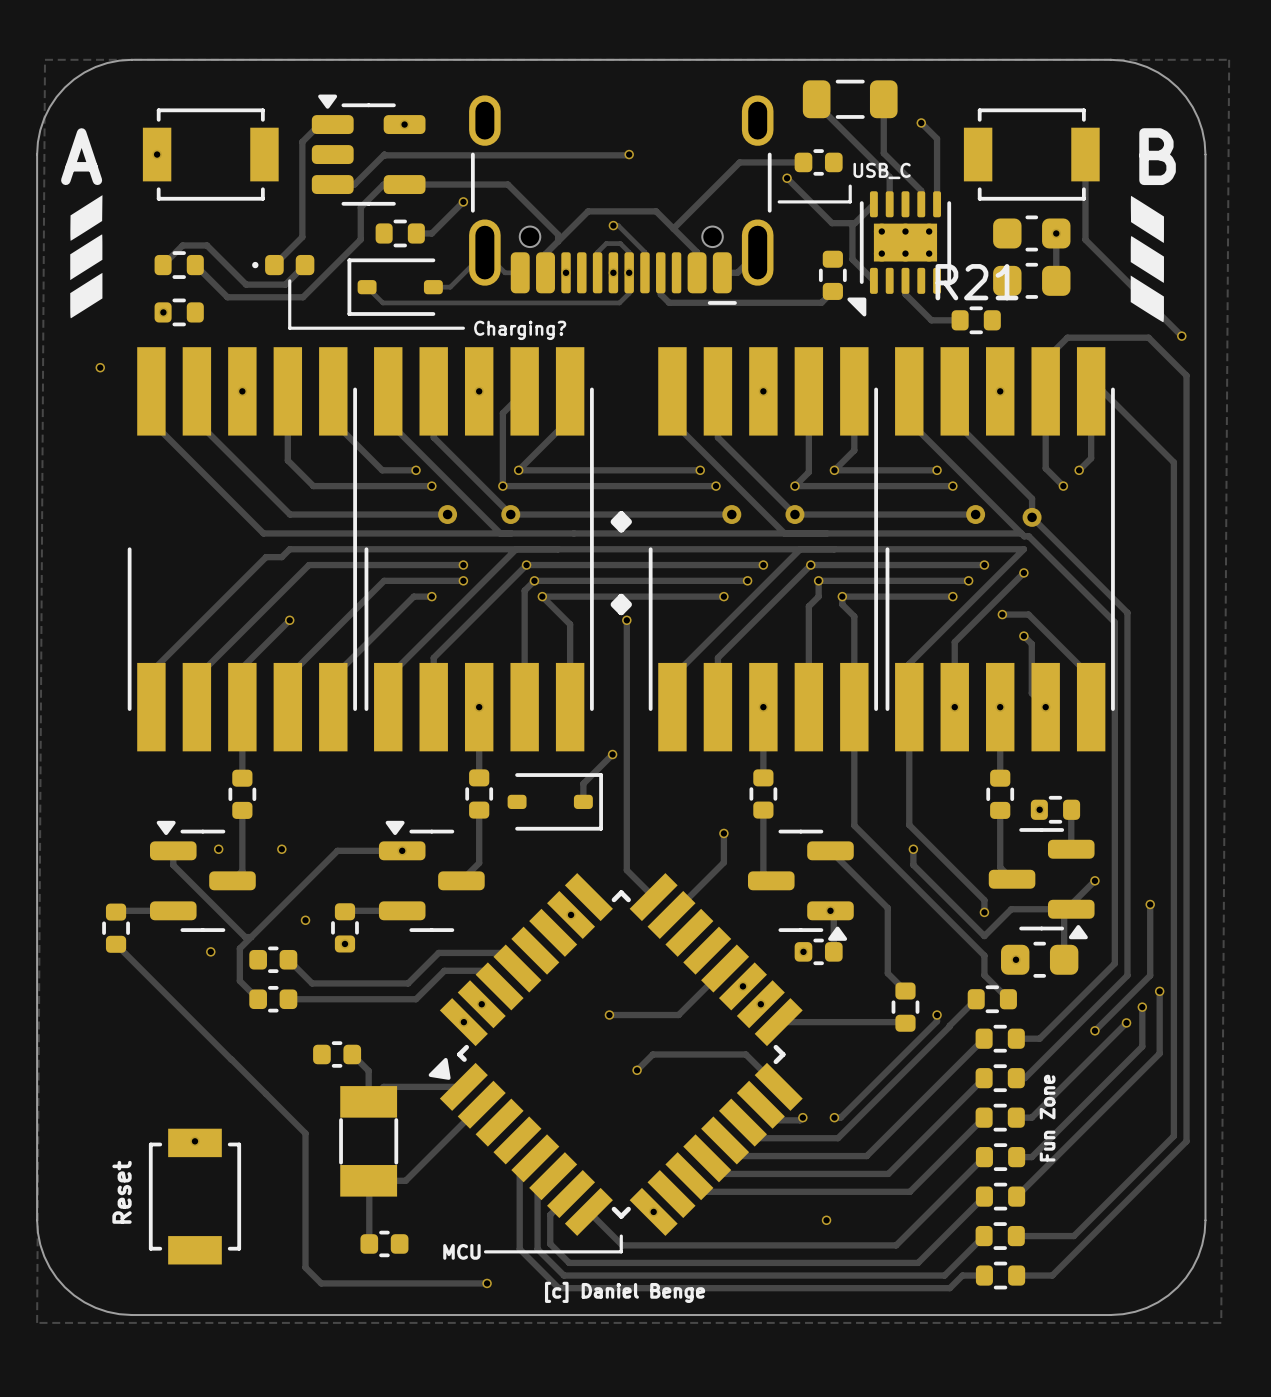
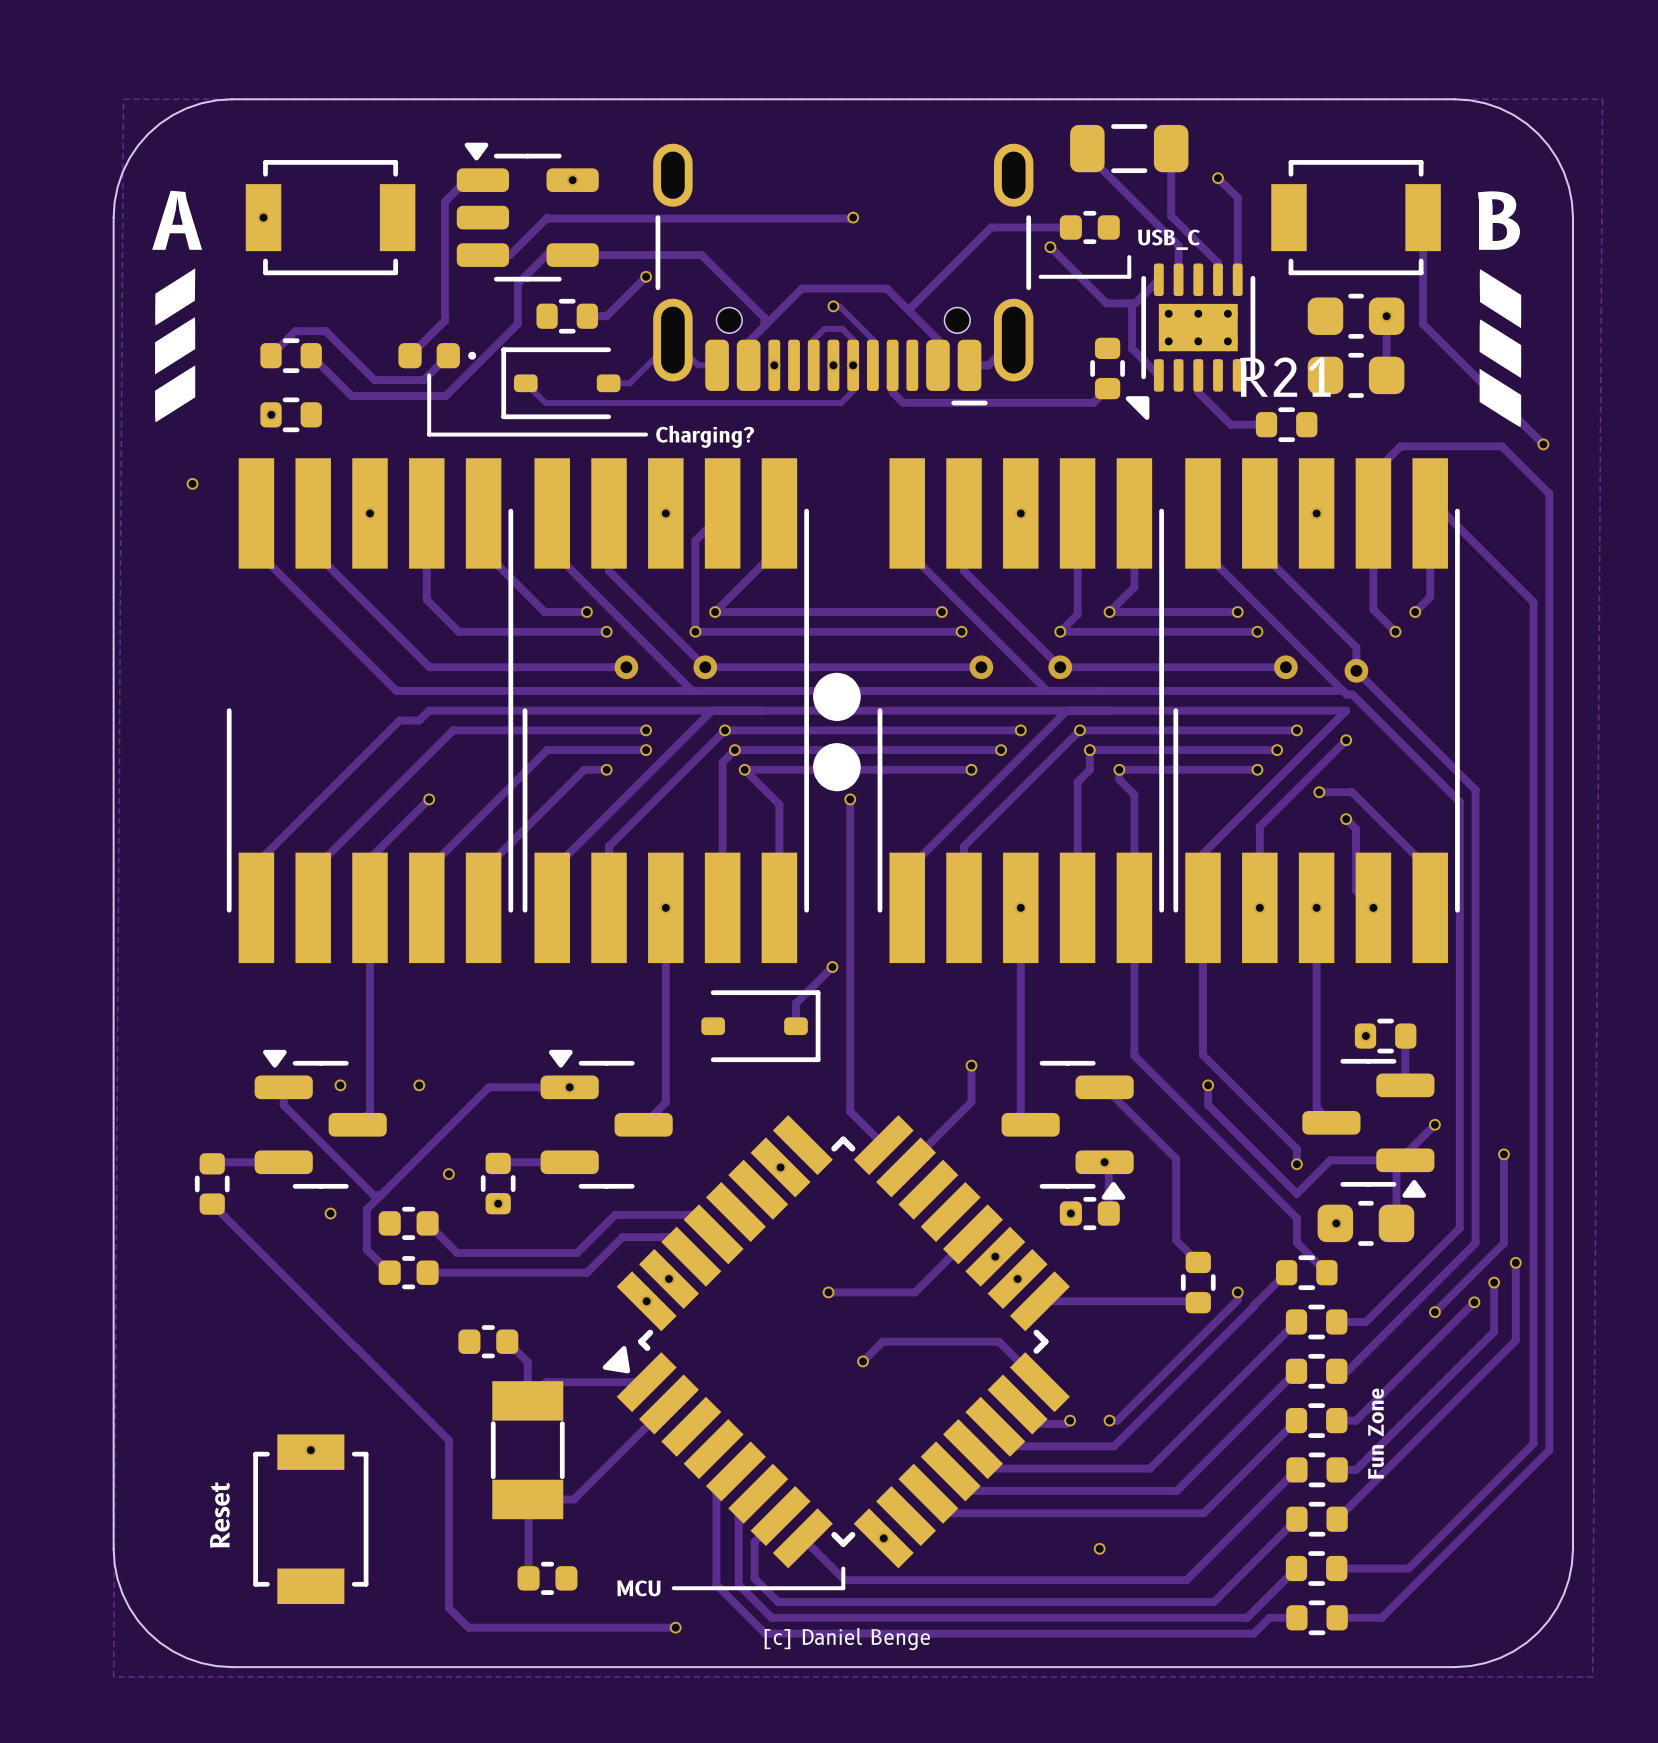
part rotation: 0° (283, 265) -> 180° (437, 355)
track: none -> (665, 996) (665, 1036)
track: none -> (1020, 996) (1020, 1036)
track: none -> (370, 996) (370, 1036)
track: none -> (1316, 996) (1316, 1036)
part: (479, 793) -> none
part: (763, 793) -> none
part: (242, 794) -> none
part: (1000, 794) -> none

